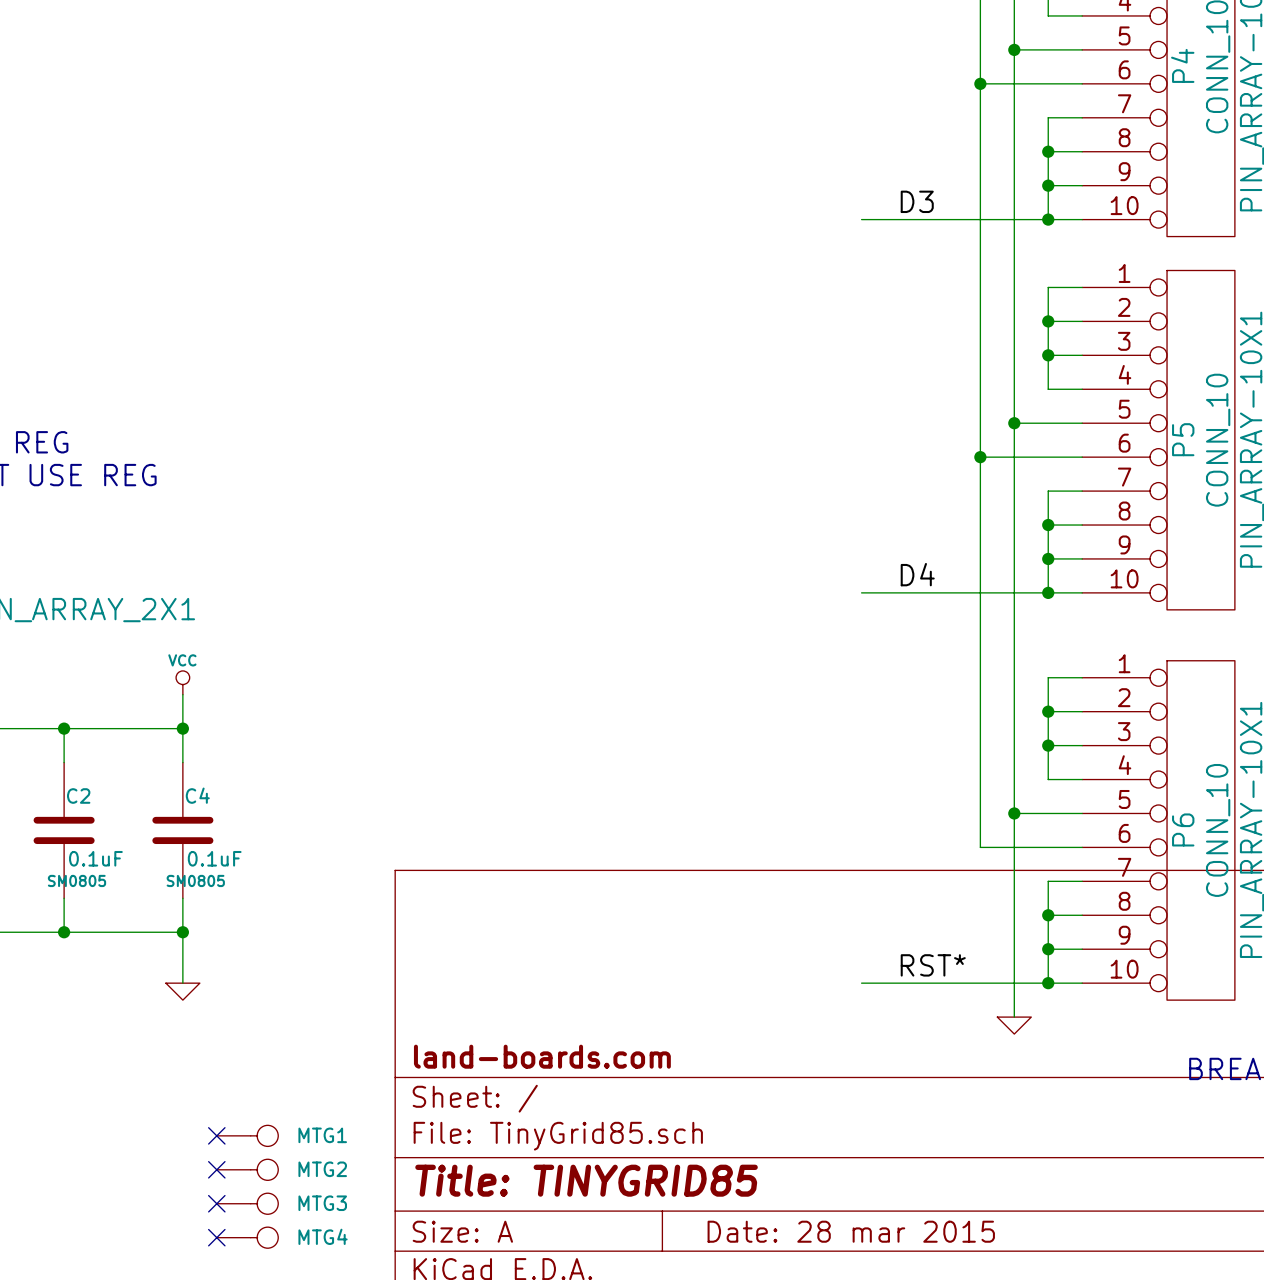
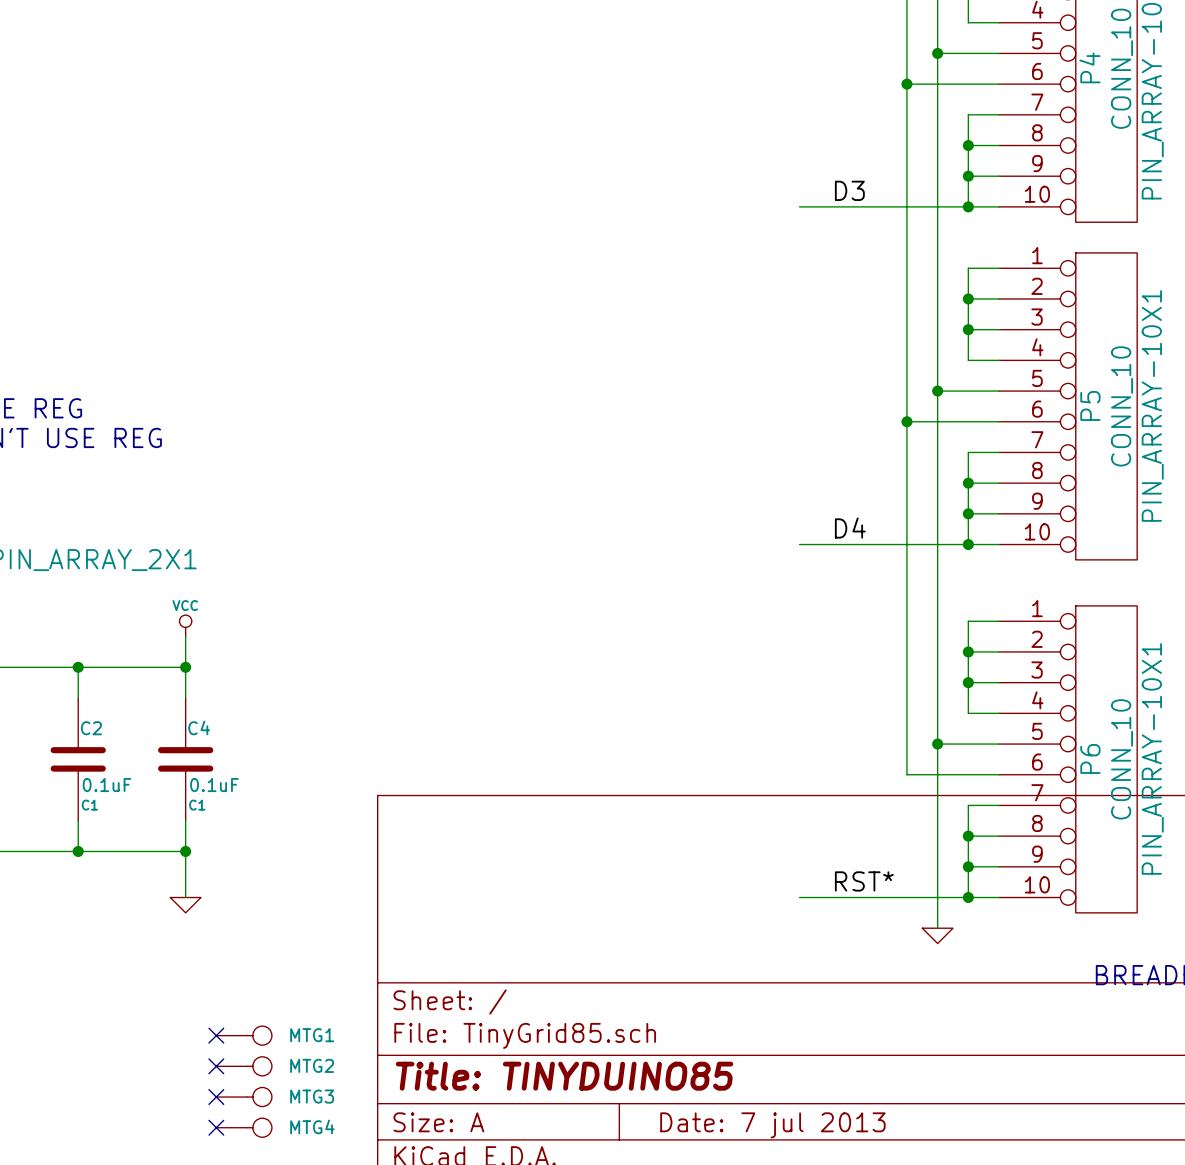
C2 text: SM0805 (77, 880) -> C1 (89, 805)
C4 text: SM0805 (195, 880) -> C1 (197, 805)
title block: land-boards.com (542, 1056) -> none
title block: Title: TINYGRID85 (586, 1180) -> Title: TINYDUINO85 (564, 1076)
title block: Date: 28 mar 2015 (851, 1231) -> Date: 7 jul 2013 (772, 1125)

